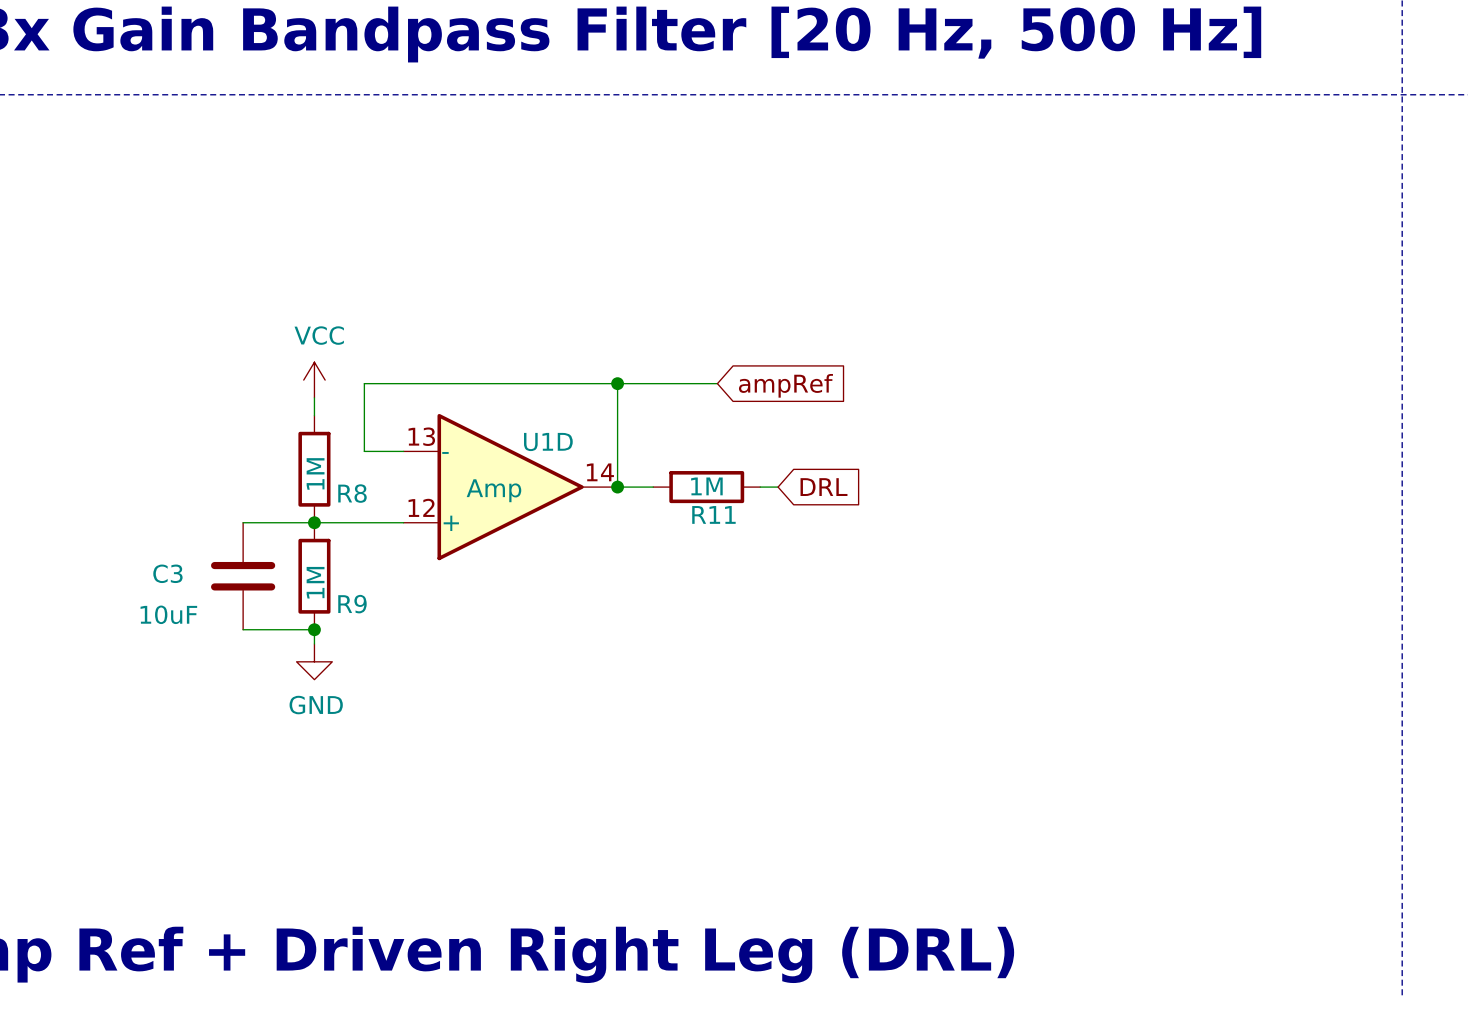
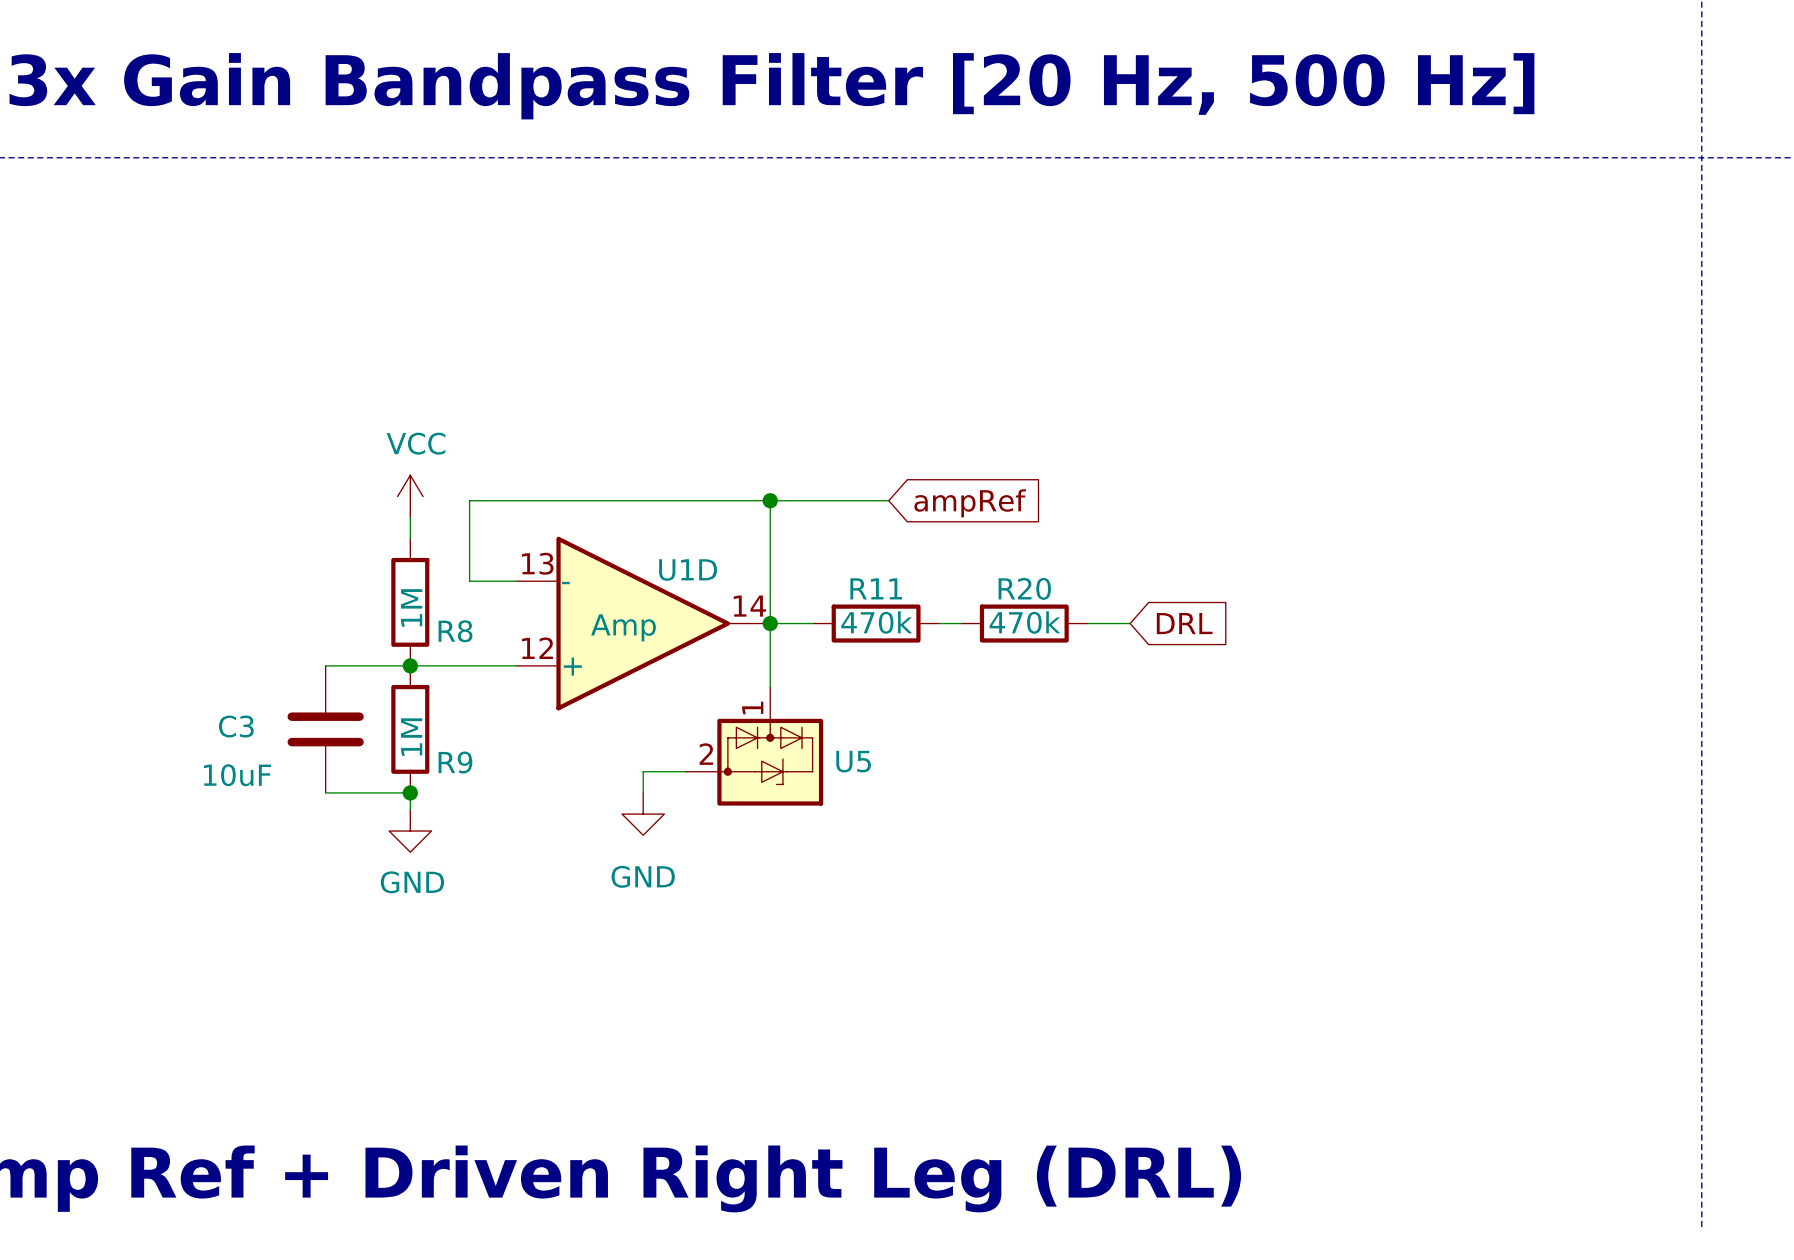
R11 value: 1M (706, 486) -> 470k (876, 622)
wire: none -> (770, 623) (770, 687)
global label position: DRL (824, 487) -> DRL (1184, 623)
R20: none -> 470k (1024, 623)
wire: none -> (1087, 623) (1130, 623)
R11 name position: R11 (713, 514) -> R11 (876, 588)
U5: none -> (754, 746)
wire: none -> (685, 771) (643, 771) (643, 792)
power symbol: none -> GND (643, 814)

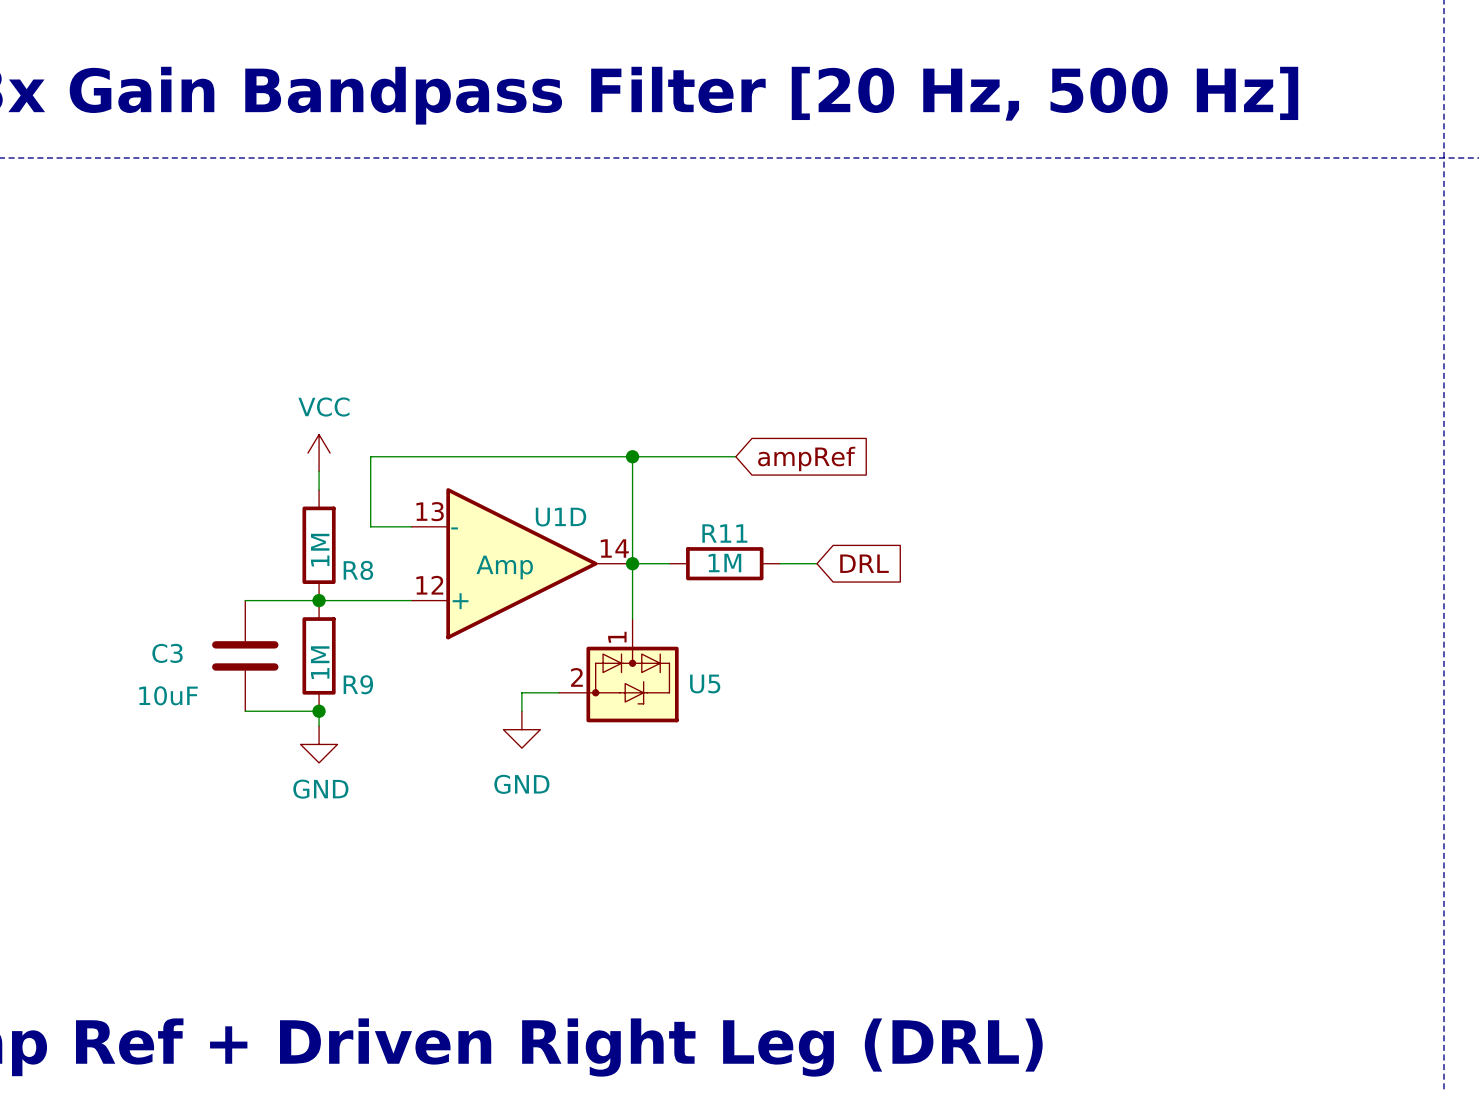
R11 value: 470k (876, 622) -> 1M (724, 563)
R20: 470k (1024, 623) -> none
wire: (1087, 623) (1130, 623) -> none
global label position: DRL (1184, 623) -> DRL (864, 563)

